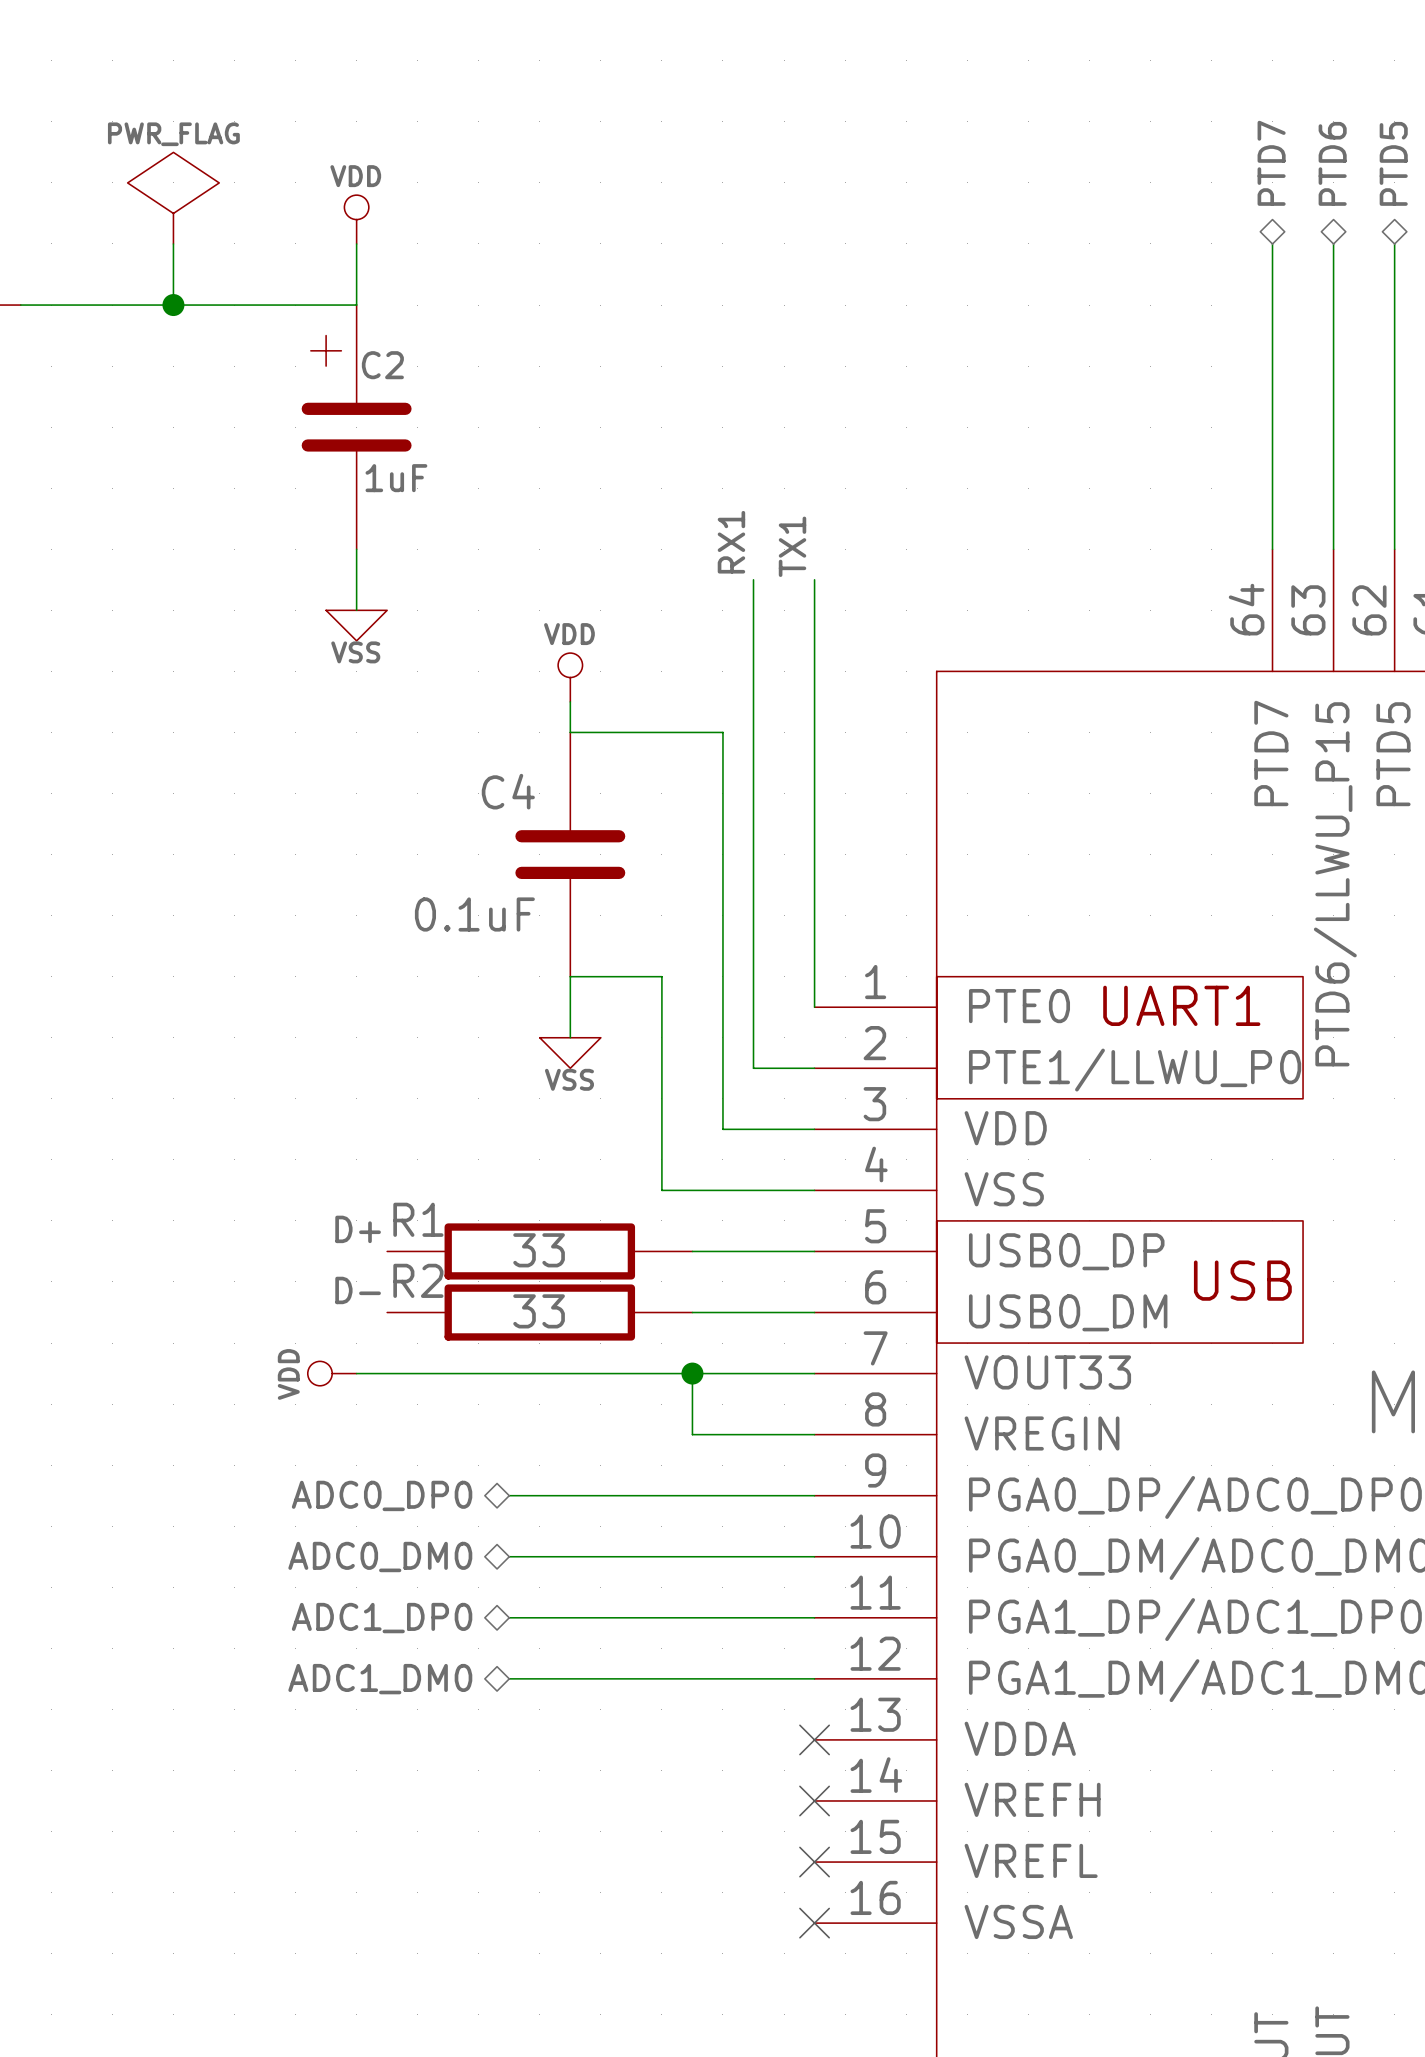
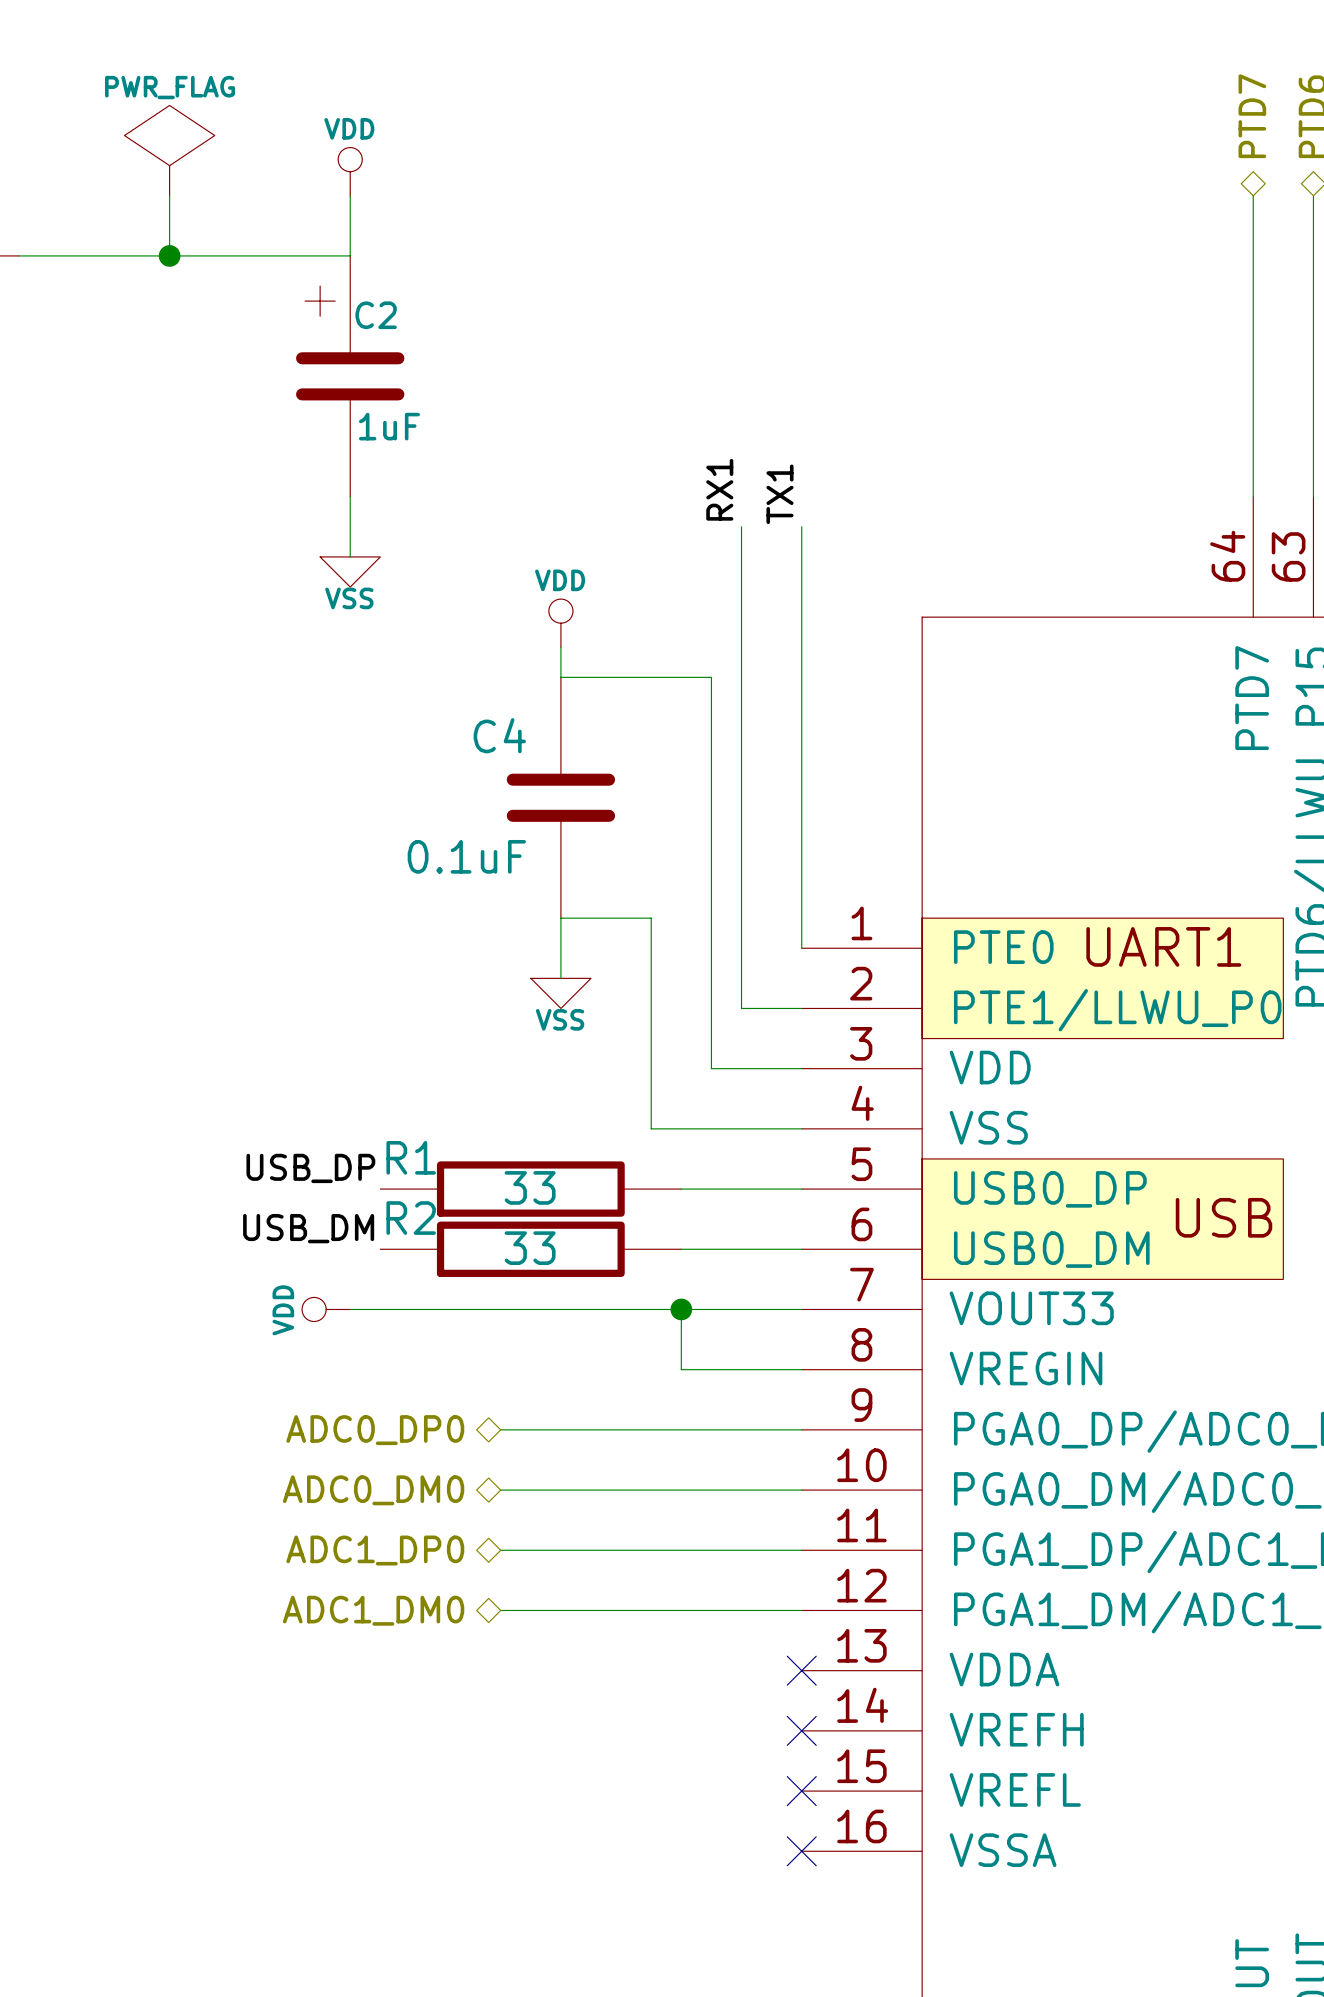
label: D+ (358, 1229) -> USB_DP (310, 1168)
label: D- (358, 1290) -> USB_DM (308, 1228)

